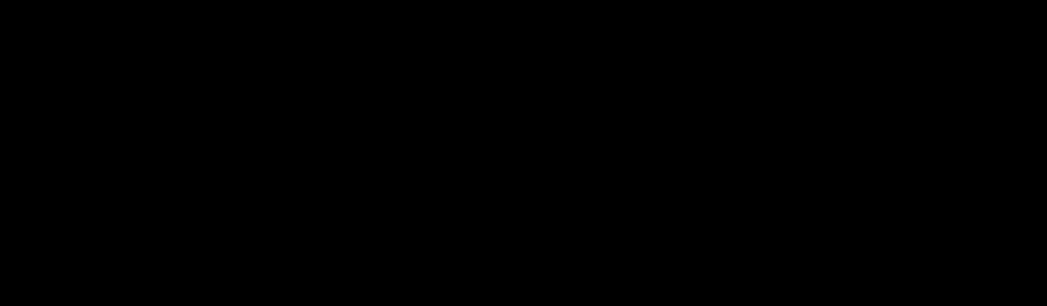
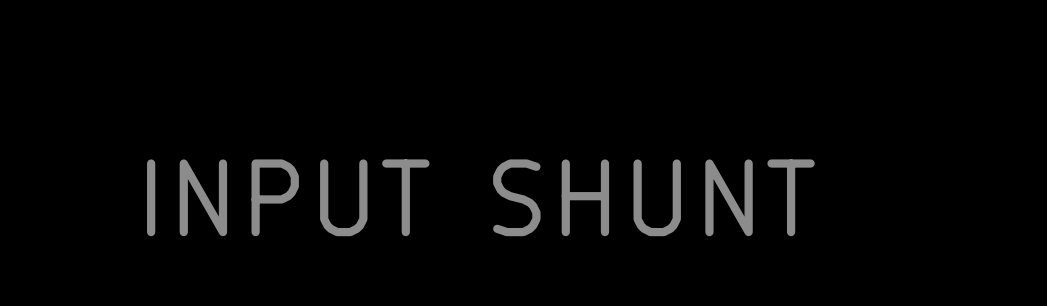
text: none -> INPUT SHUNT (480, 197)

